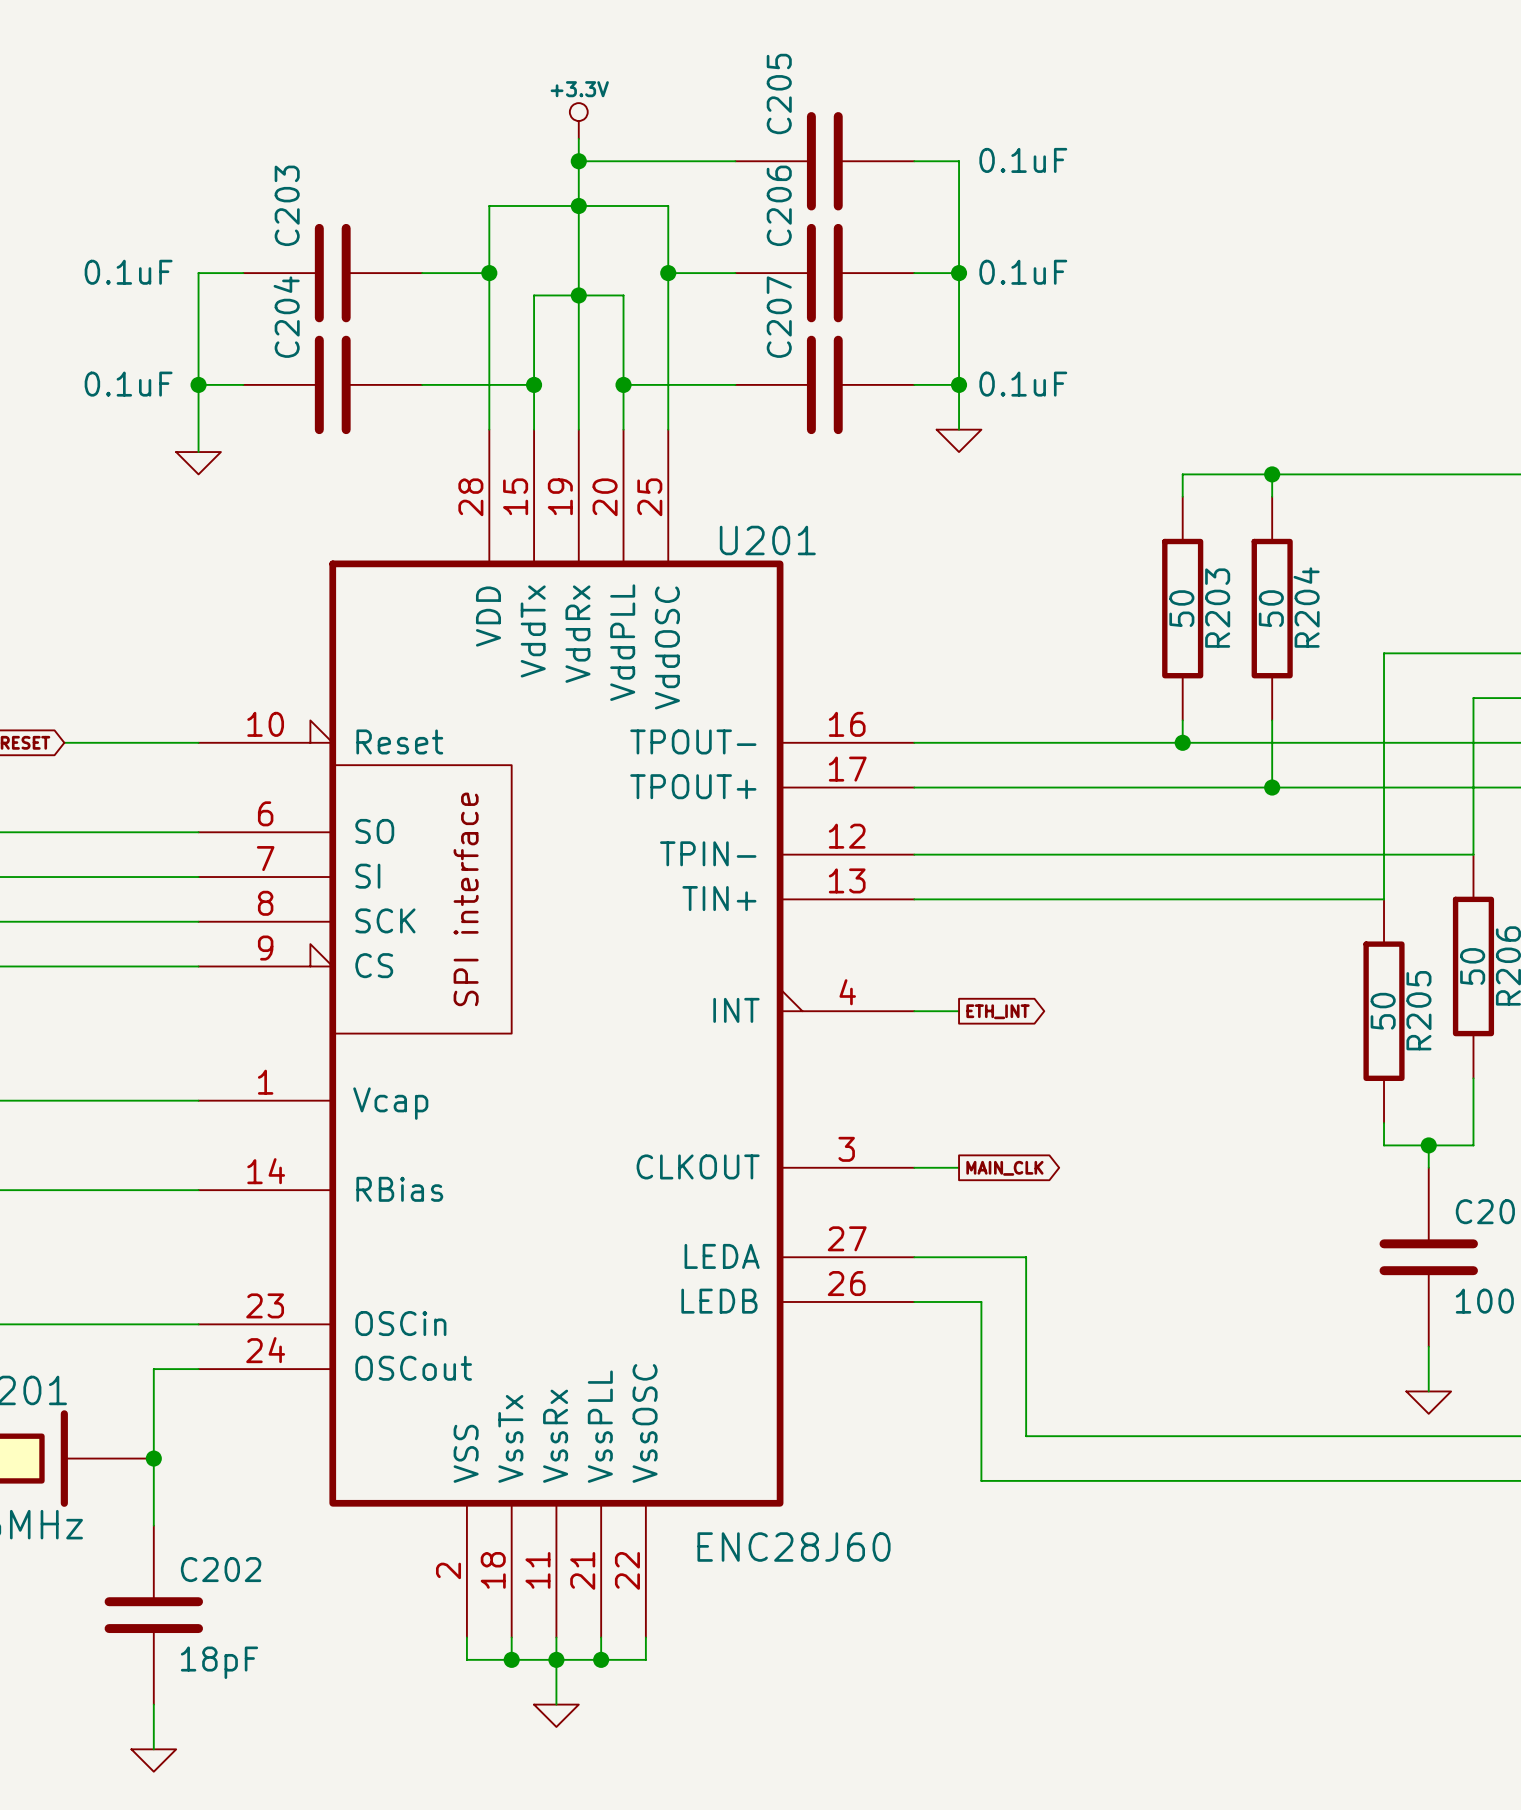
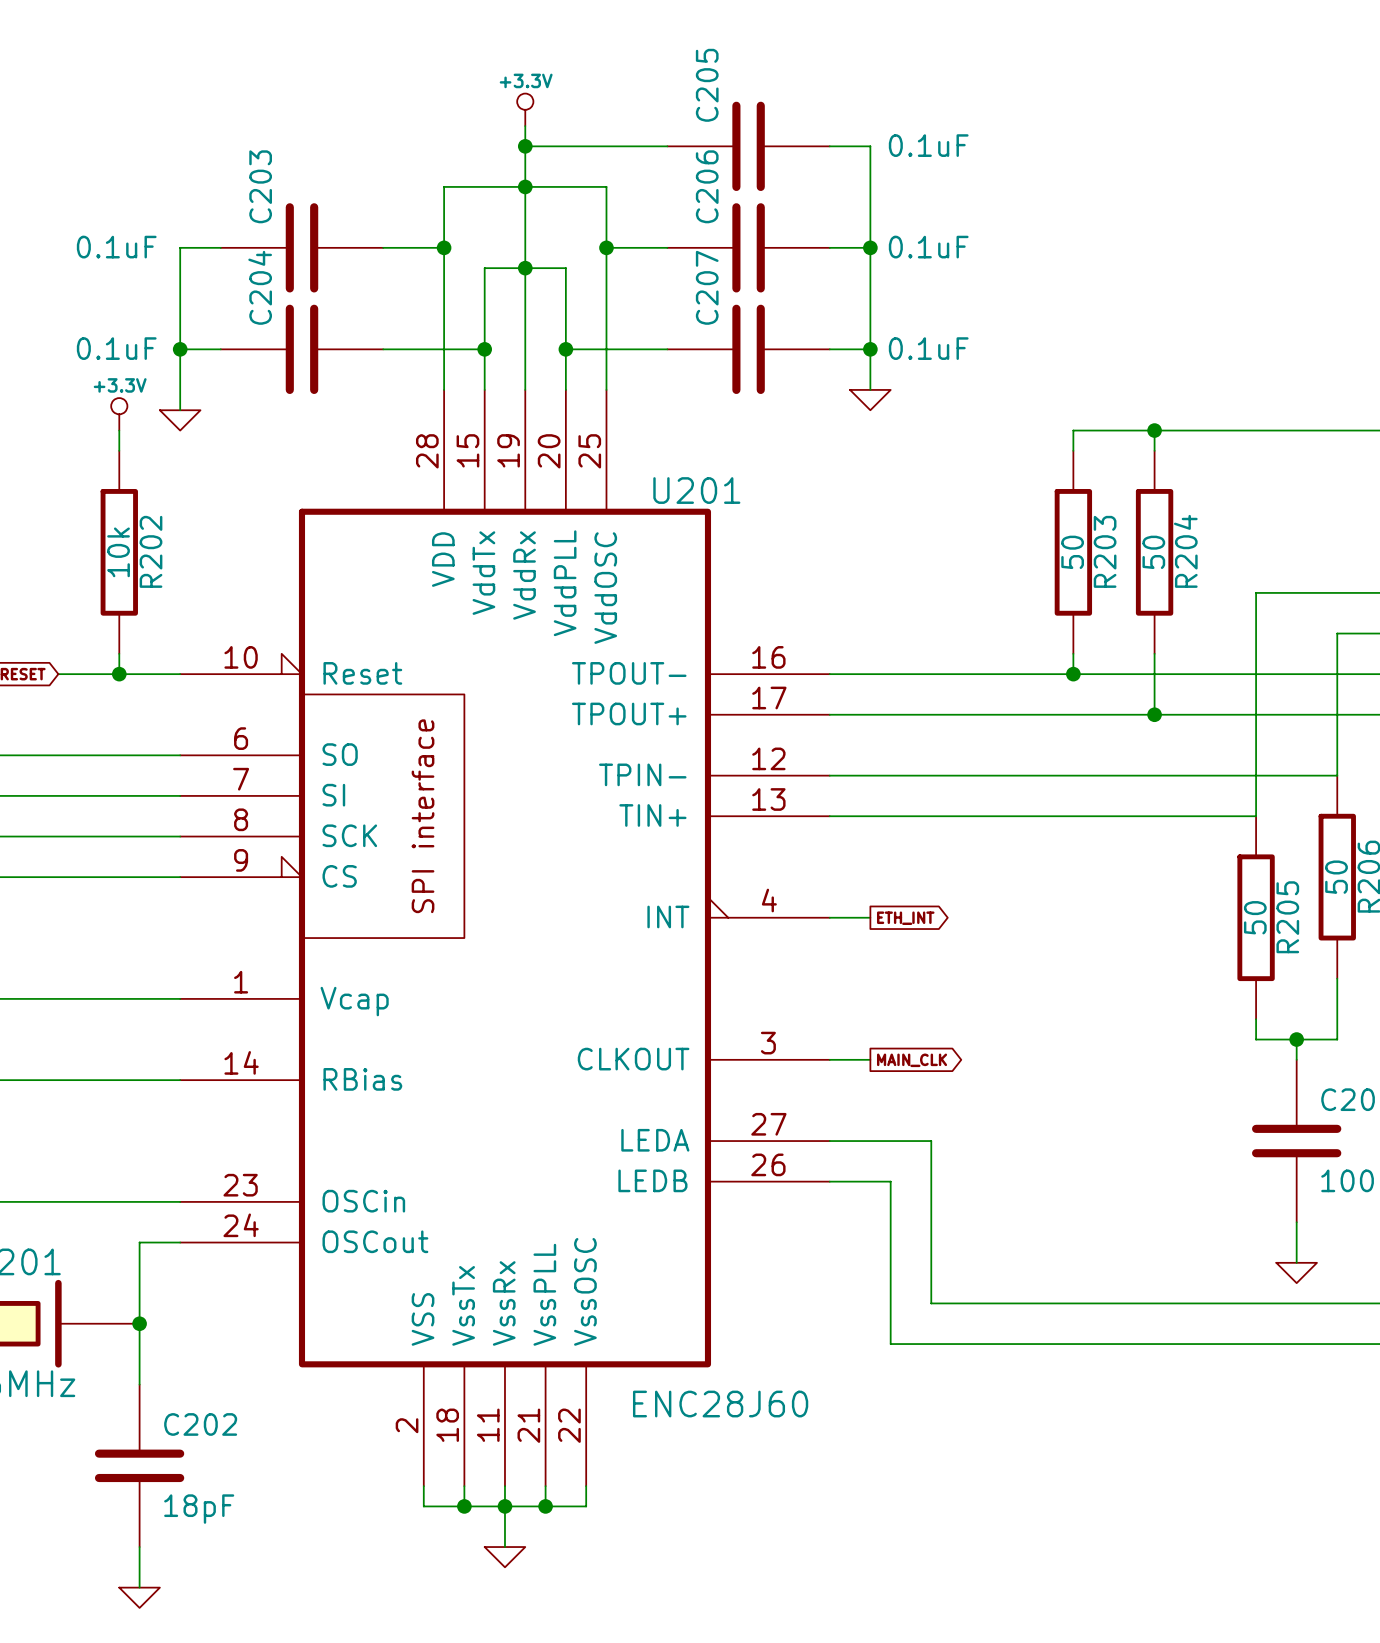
power symbol: none -> +3.3V (119, 414)
wire: none -> (119, 430) (119, 450)
R202: none -> 10k (119, 552)
wire: none -> (119, 653) (119, 674)
junction: none -> (119, 674)

